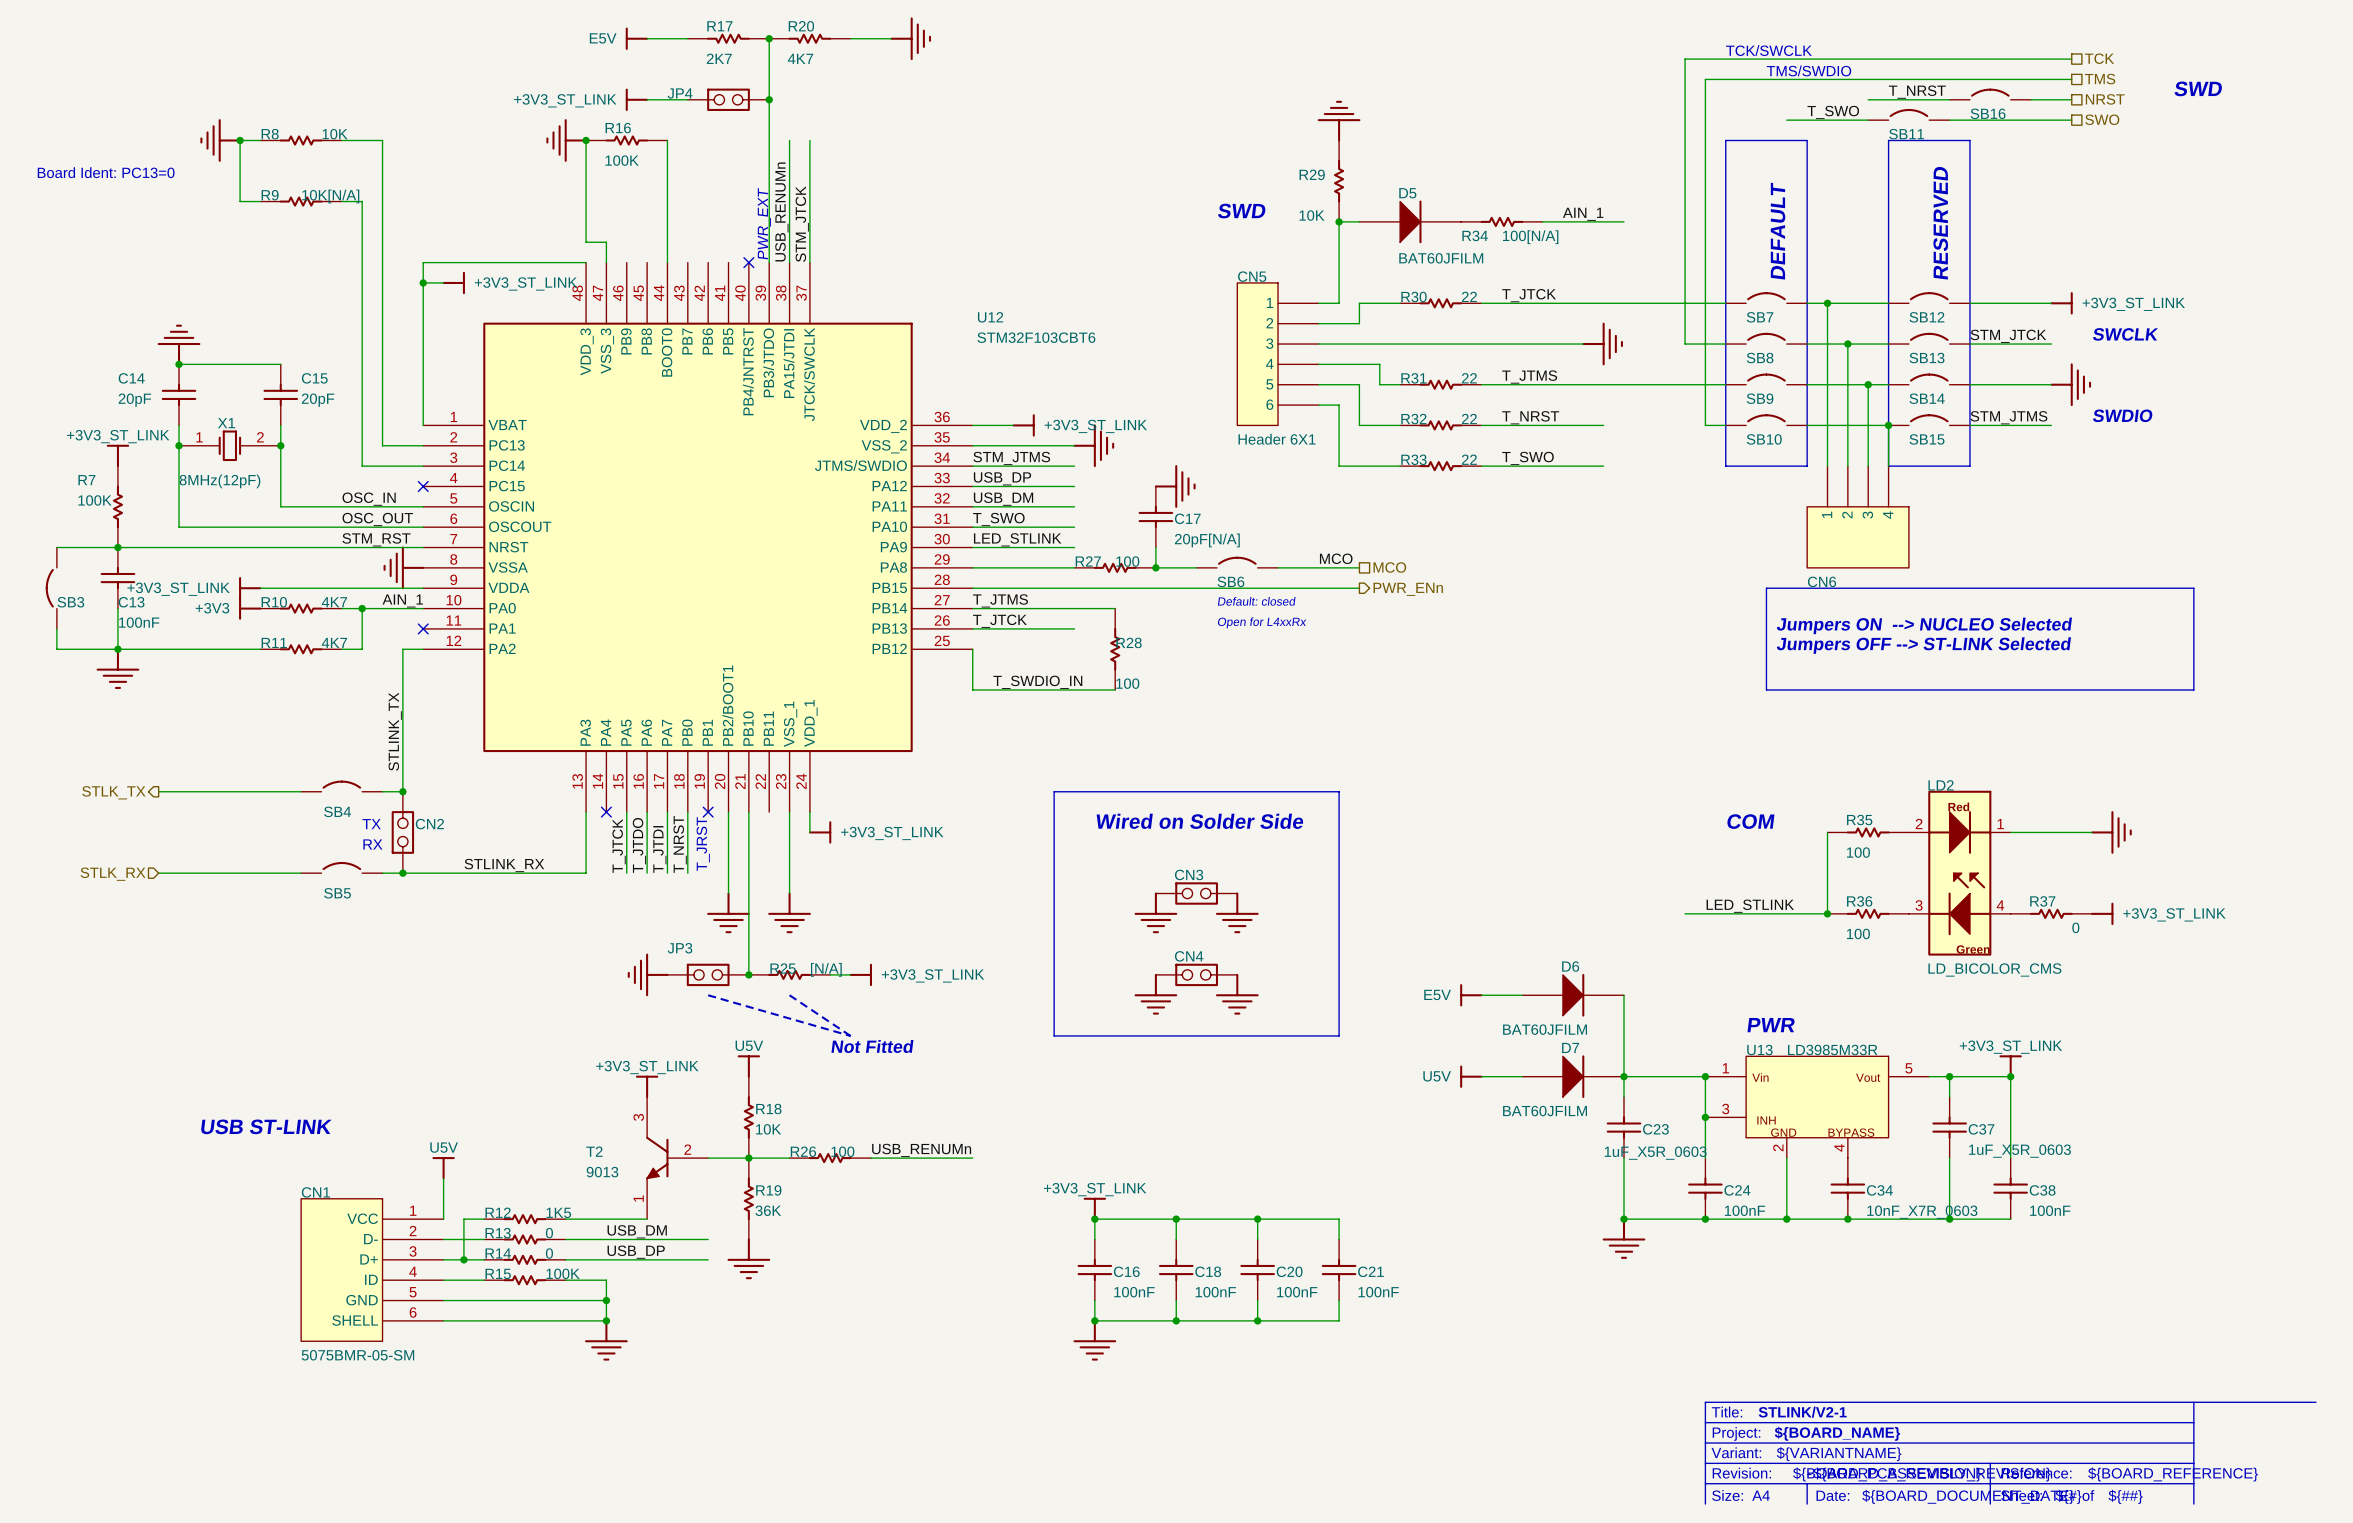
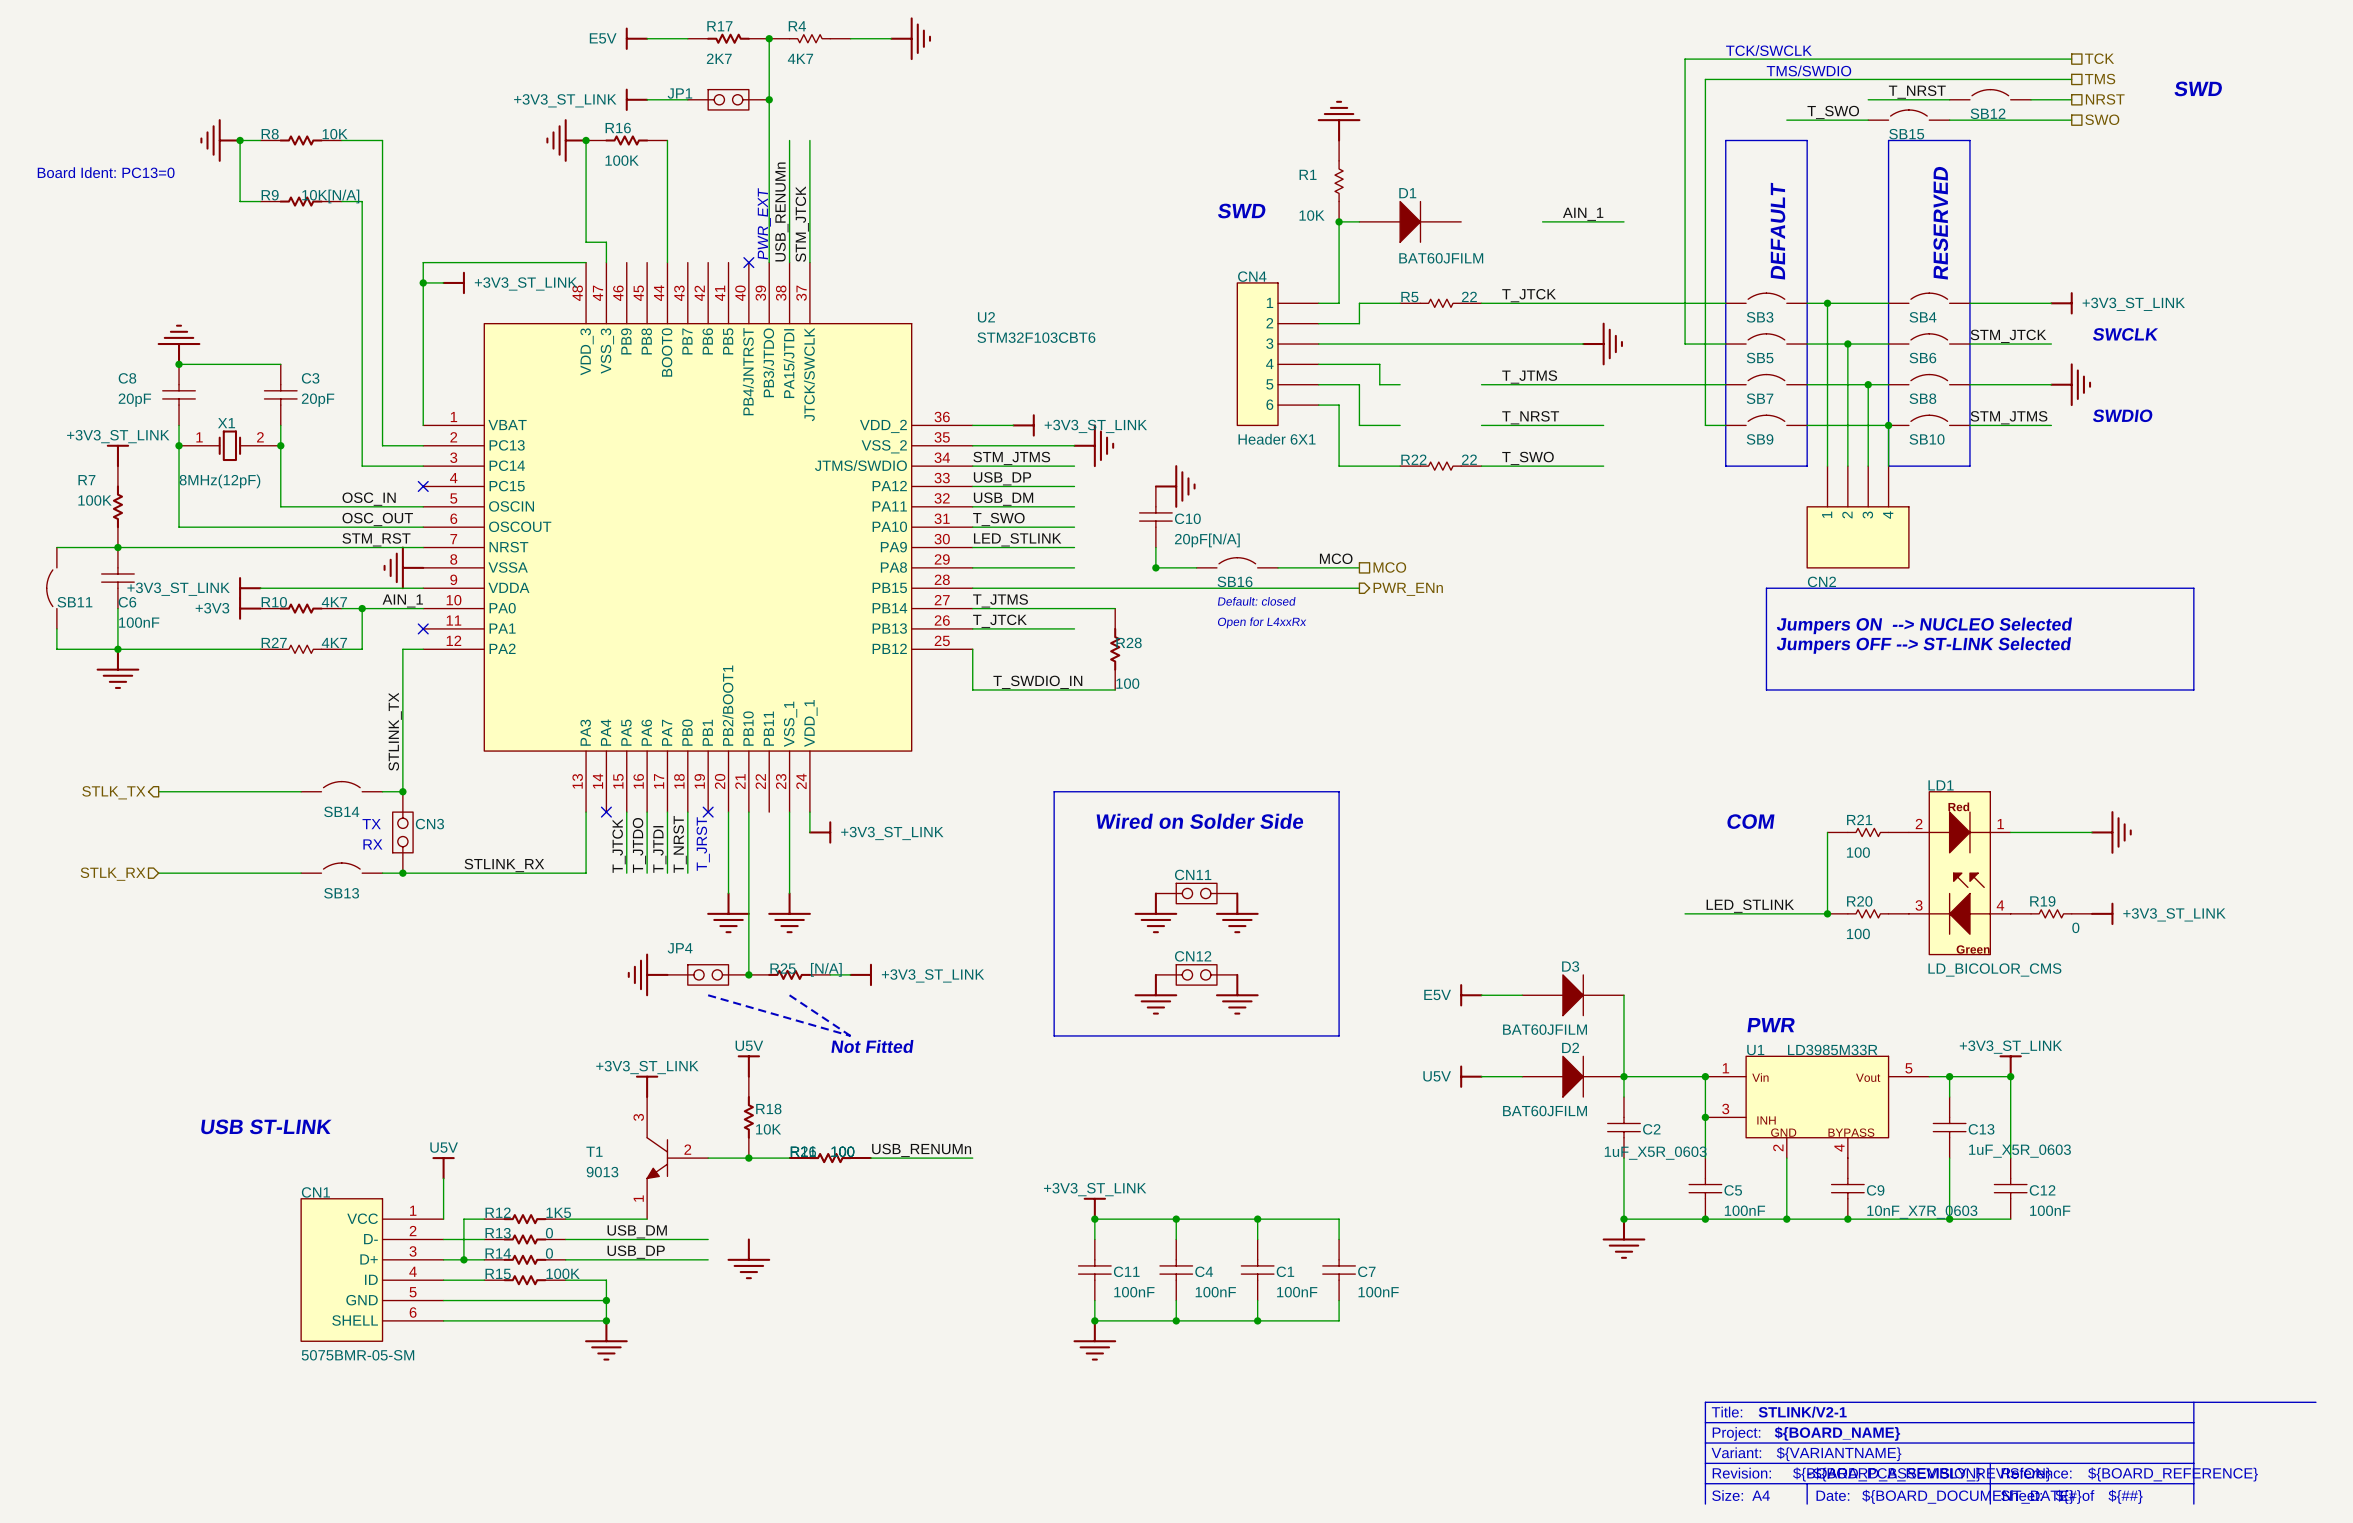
R20 symbol: [769, 33, 851, 44] -> [1827, 909, 1909, 918]
R4: none -> 4K7 (809, 38)
JP4 symbol: [687, 88, 770, 111] -> [667, 964, 749, 986]
SB16 symbol: [1949, 88, 2032, 100] -> [1196, 557, 1279, 568]
JP4 name position: JP4 (680, 93) -> JP4 (680, 948)
JP1: none -> (728, 99)
SB11 symbol: [1868, 108, 1950, 121] -> [46, 547, 57, 629]
SB11 name position: SB11 (1906, 134) -> SB11 (74, 602)
R29: 10K (1339, 181) -> none
R1: none -> 10K (1339, 181)
D5: BAT60JFILM (1410, 221) -> none
D1: none -> BAT60JFILM (1410, 221)
R34: 100[N/A] (1501, 221) -> none
CN5 name: CN5 (1252, 276) -> CN4 (1252, 276)
SB7 symbol: [1725, 292, 1808, 304] -> [1725, 374, 1808, 385]
SB12 symbol: [1888, 292, 1970, 304] -> [1949, 89, 2032, 100]
R30: 22 (1440, 303) -> none
R5: none -> 22 (1440, 303)
SB8 symbol: [1725, 332, 1808, 345] -> [1888, 374, 1970, 385]
SB13 symbol: [1888, 332, 1970, 345] -> [301, 862, 383, 874]
SB9 symbol: [1725, 373, 1808, 385] -> [1725, 415, 1808, 426]
SB14 symbol: [1888, 373, 1970, 385] -> [301, 781, 383, 792]
R31: 22 (1440, 384) -> none
C14: 20pF (179, 394) -> none
C8: none -> 20pF (179, 394)
C15: 20pF (280, 394) -> none
C3: none -> 20pF (280, 394)
SB10 symbol: [1725, 414, 1808, 426] -> [1888, 415, 1970, 426]
SB15 symbol: [1888, 414, 1970, 426] -> [1868, 109, 1950, 121]
R32: 22 (1440, 425) -> none
R33: 22 (1440, 466) -> none
R22: none -> 22 (1440, 466)
C17: 20pF[N/A] (1155, 517) -> none
C10: none -> 20pF[N/A] (1155, 517)
U12: STM32F103CBT6 (697, 537) -> none
U2: none -> STM32F103CBT6 (697, 537)
SB3 symbol: [45, 547, 57, 629] -> [1725, 293, 1808, 304]
C13 symbol: [100, 547, 136, 609] -> [1933, 1097, 1966, 1159]
SB6 symbol: [1196, 556, 1279, 568] -> [1888, 333, 1970, 345]
R27 value: 100 (1127, 561) -> 4K7 (334, 642)
R27 symbol: [1074, 562, 1156, 573] -> [260, 645, 342, 654]
C6: none -> 100nF (117, 578)
CN6 name: CN6 (1822, 581) -> CN2 (1821, 581)
SB3 name position: SB3 (70, 602) -> SB3 (1760, 317)
C13 name position: C13 (131, 602) -> C13 (1981, 1129)
R11 value: 4K7 (334, 642) -> 100 (842, 1151)
R11 symbol: [260, 644, 342, 655] -> [789, 1154, 871, 1163]
SB4 symbol: [301, 780, 383, 792] -> [1888, 293, 1970, 304]
CN2: (402, 832) -> none
R35: 100 (1868, 832) -> none
R21: none -> 100 (1868, 832)
SB5 symbol: [301, 861, 383, 874] -> [1725, 333, 1808, 345]
LD2: LD_BICOLOR_CMS (1959, 873) -> none
LD1: none -> LD_BICOLOR_CMS (1959, 873)
CN3 name position: CN3 (1189, 874) -> CN3 (429, 824)
CN3 symbol: [1155, 882, 1238, 905] -> [392, 791, 414, 874]
CN11: none -> (1196, 893)
R36: 100 (1868, 913) -> none
R37: 0 (2051, 913) -> none
JP3: (708, 974) -> none
CN4: (1196, 974) -> none
CN12: none -> (1196, 974)
D6: BAT60JFILM (1573, 995) -> none
D3: none -> BAT60JFILM (1573, 995)
U13 name: U13 (1759, 1049) -> U1 (1755, 1050)
D7: BAT60JFILM (1573, 1076) -> none
D2: none -> BAT60JFILM (1573, 1076)
C23: 1uF_X5R_0603 (1623, 1127) -> none
C2: none -> 1uF_X5R_0603 (1623, 1127)
C37: 1uF_X5R_0603 (1949, 1127) -> none
T2: 9013 (677, 1158) -> none
T1: none -> 9013 (677, 1158)
R19 symbol: [743, 1158, 754, 1240] -> [2010, 909, 2093, 918]
C24: 100nF (1705, 1188) -> none
C5: none -> 100nF (1705, 1188)
C34: 10nF_X7R_0603 (1847, 1188) -> none
C9: none -> 10nF_X7R_0603 (1847, 1188)
C38: 100nF (2010, 1188) -> none
C12: none -> 100nF (2010, 1188)
R19 name position: R19 (768, 1190) -> R19 (2042, 901)
R19 value: 36K (768, 1210) -> 0 (2075, 927)
C16: 100nF (1094, 1270) -> none
C11: none -> 100nF (1094, 1270)
C18: 100nF (1176, 1270) -> none
C4: none -> 100nF (1176, 1270)
C20: 100nF (1257, 1270) -> none
C1: none -> 100nF (1257, 1270)
C21: 100nF (1339, 1270) -> none
C7: none -> 100nF (1339, 1270)

